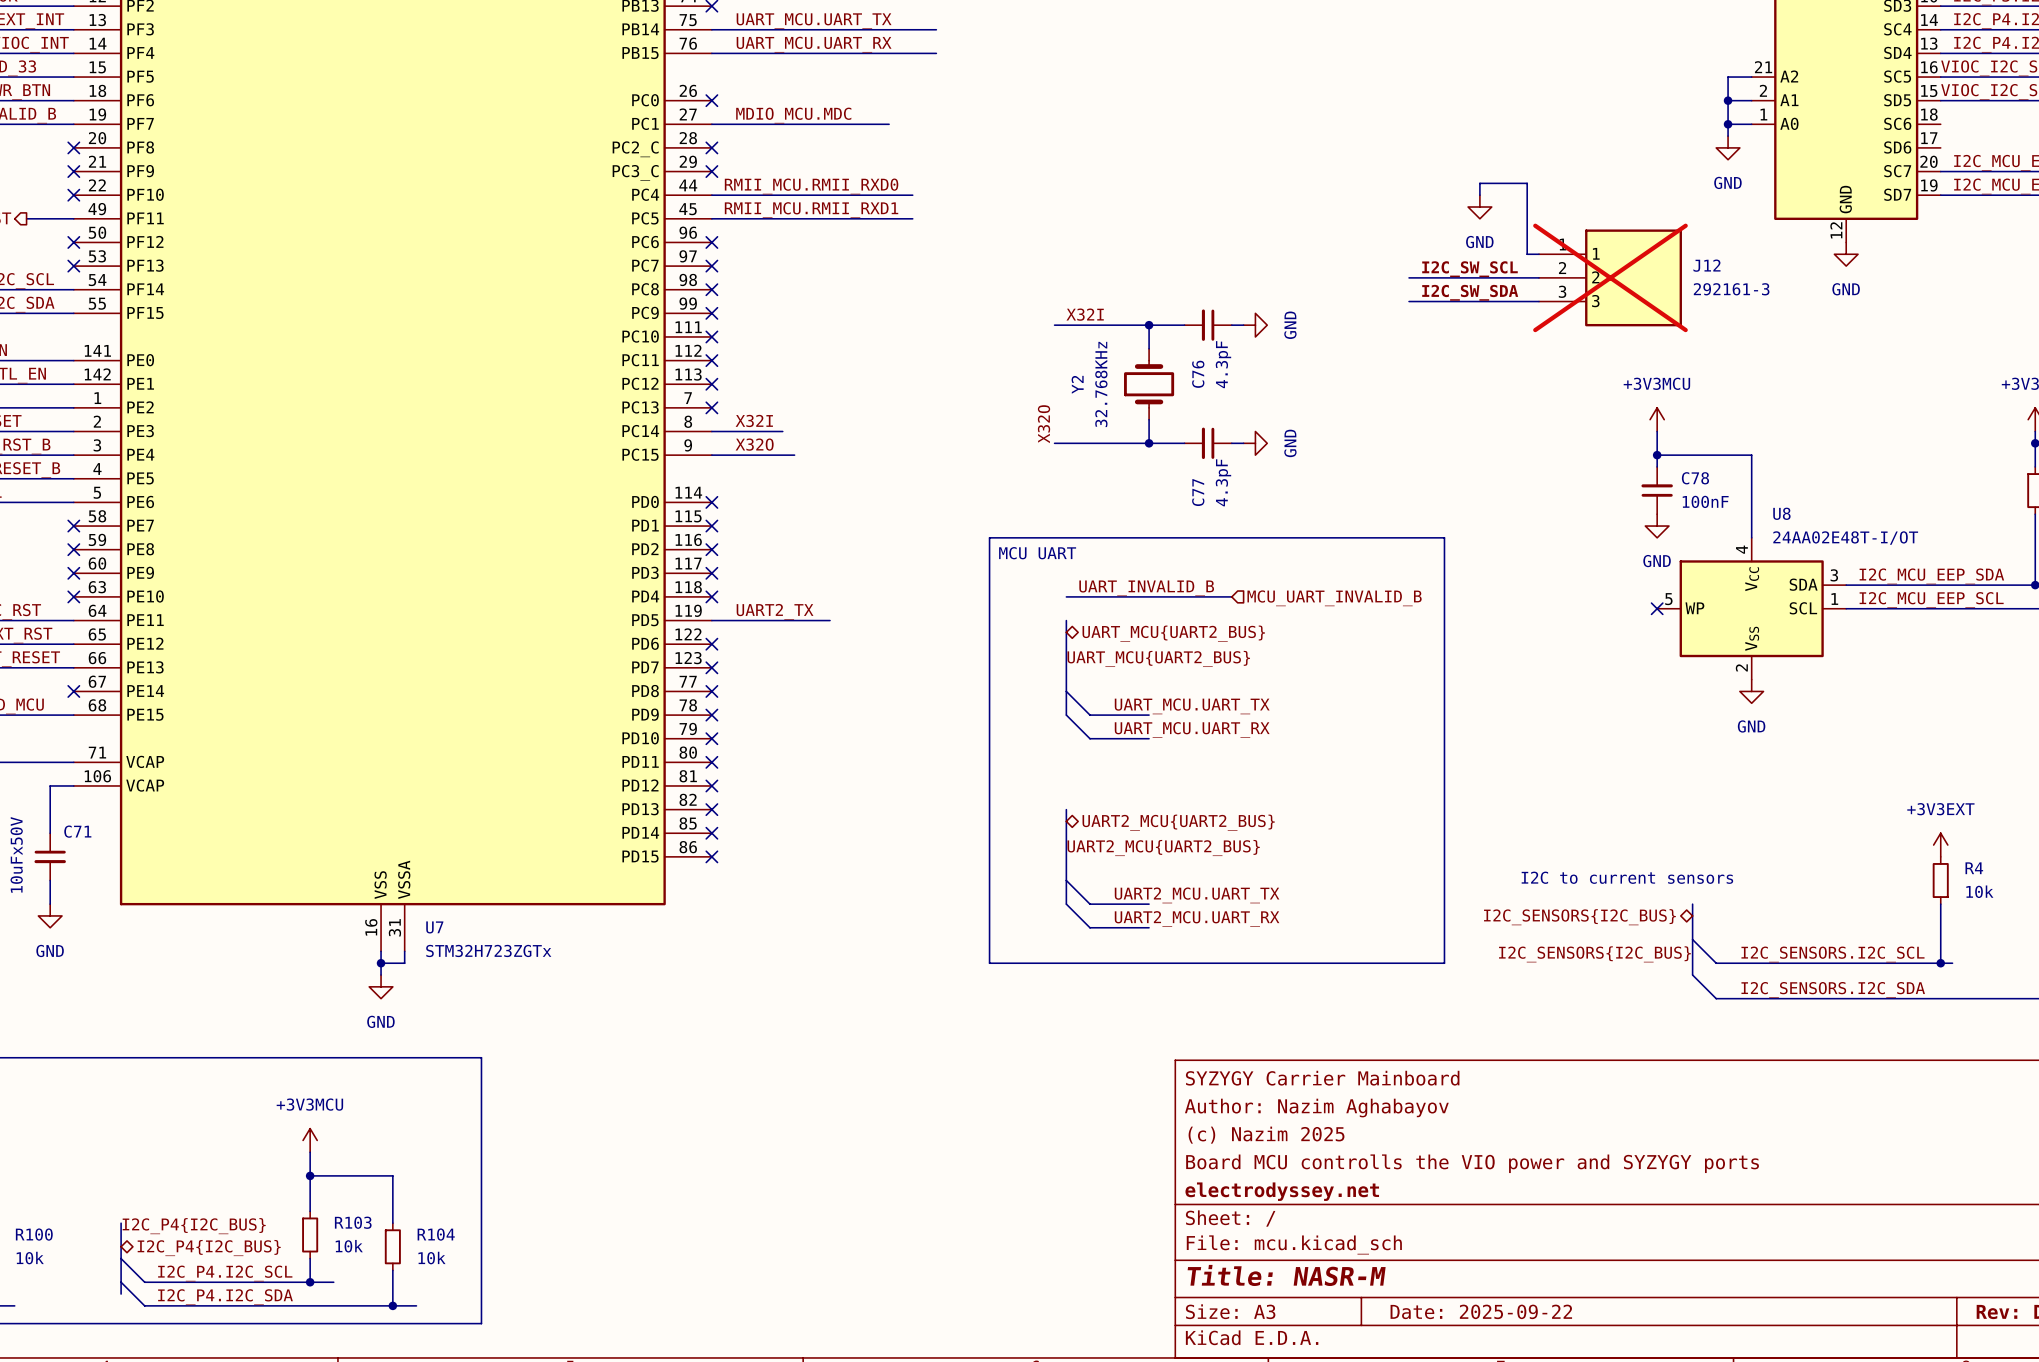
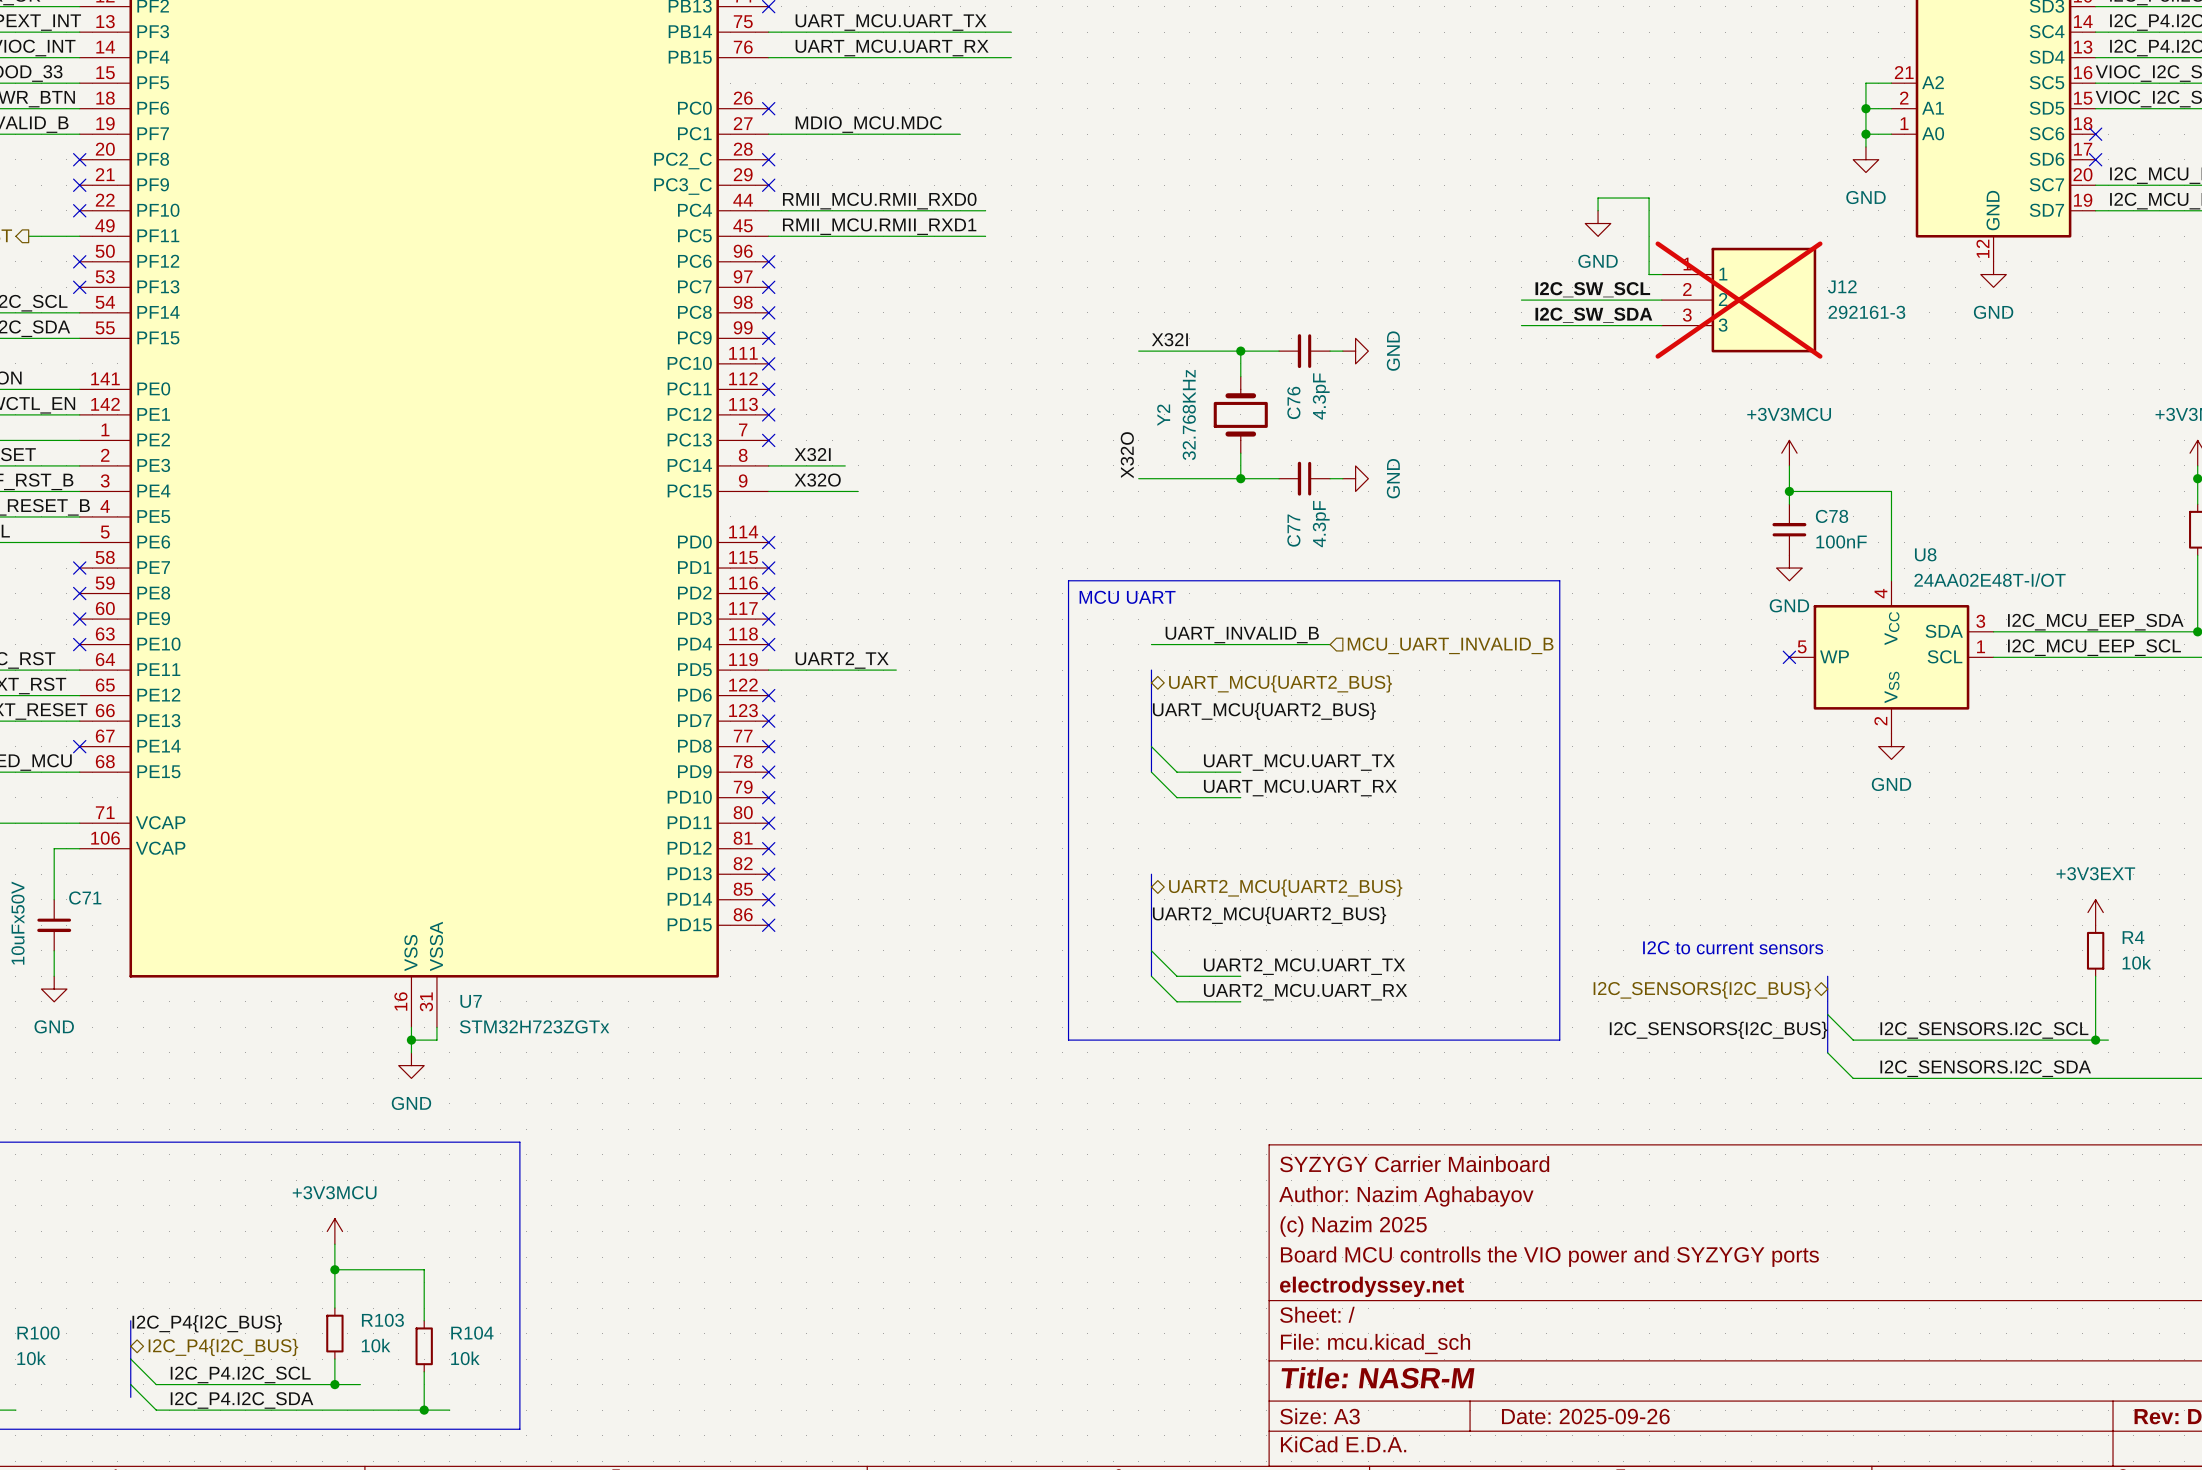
no-connect mark: none -> (2095, 134)
no-connect mark: none -> (2095, 159)
title block: Date: 2025-09-22 (1481, 1311) -> Date: 2025-09-26 (1585, 1416)

